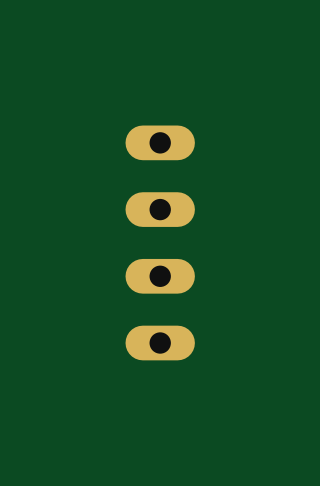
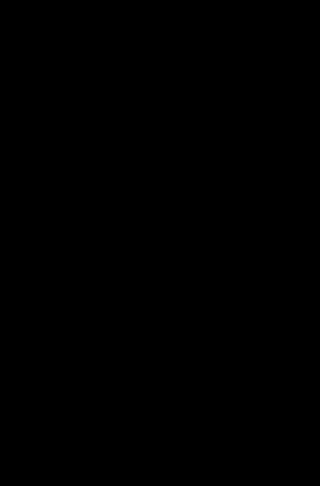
part: (160, 242) -> none

